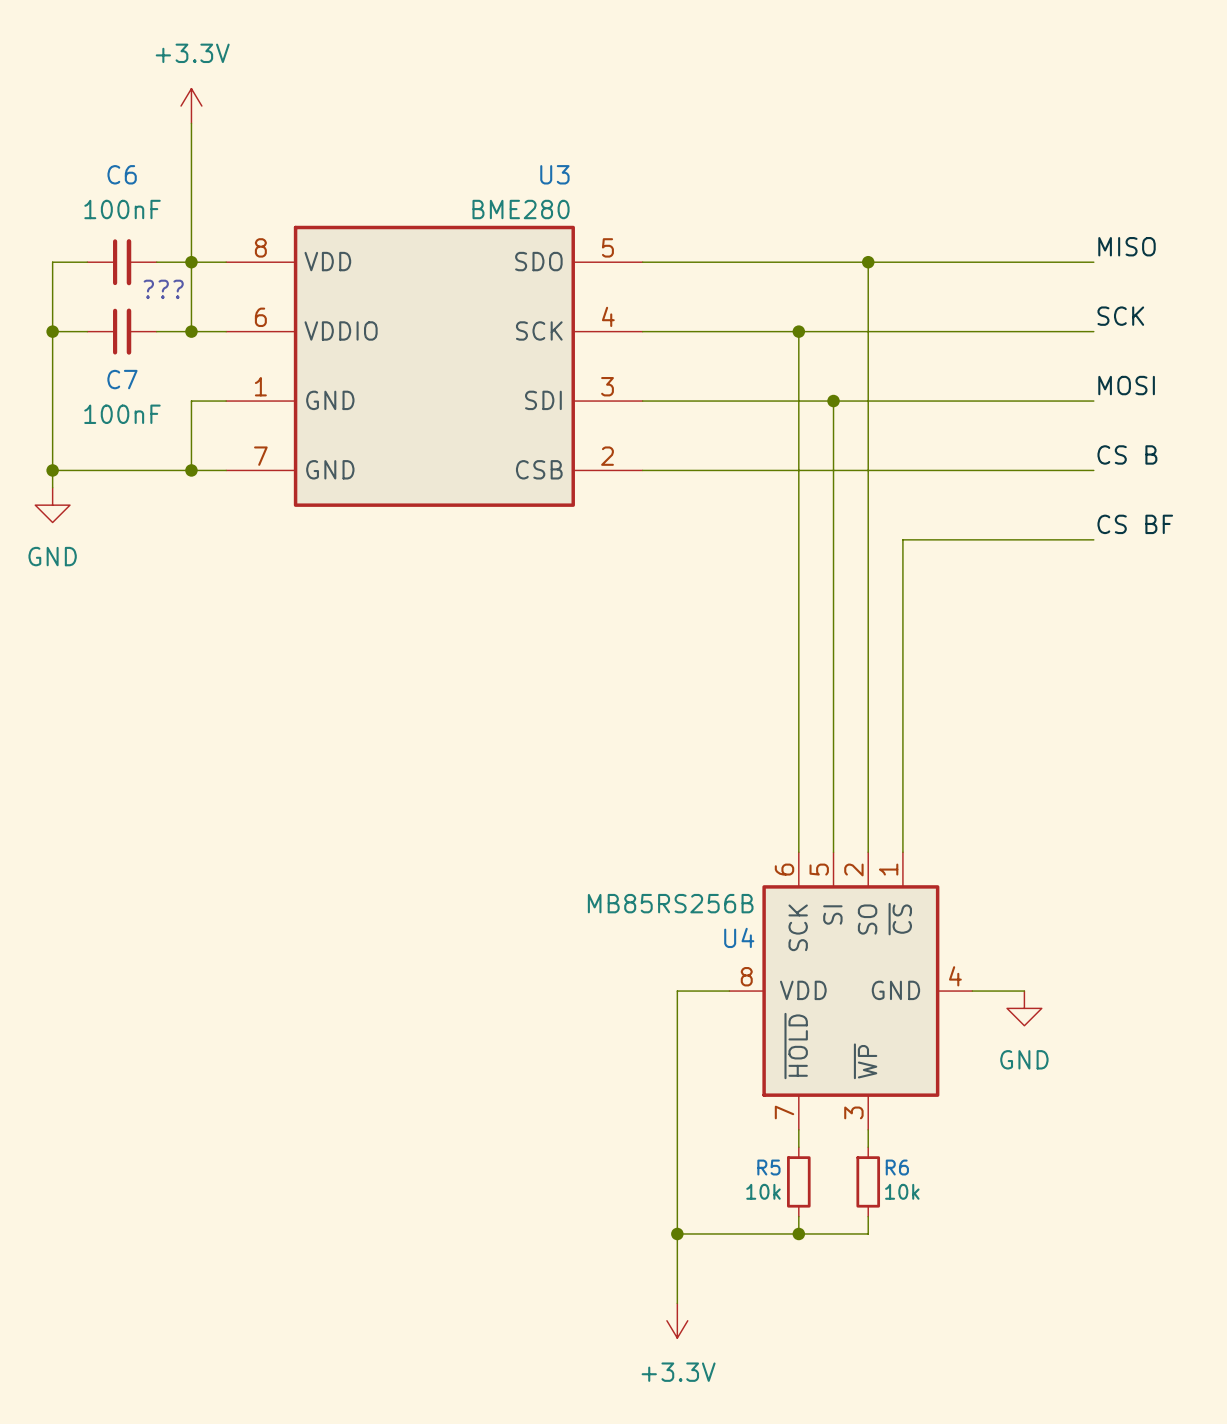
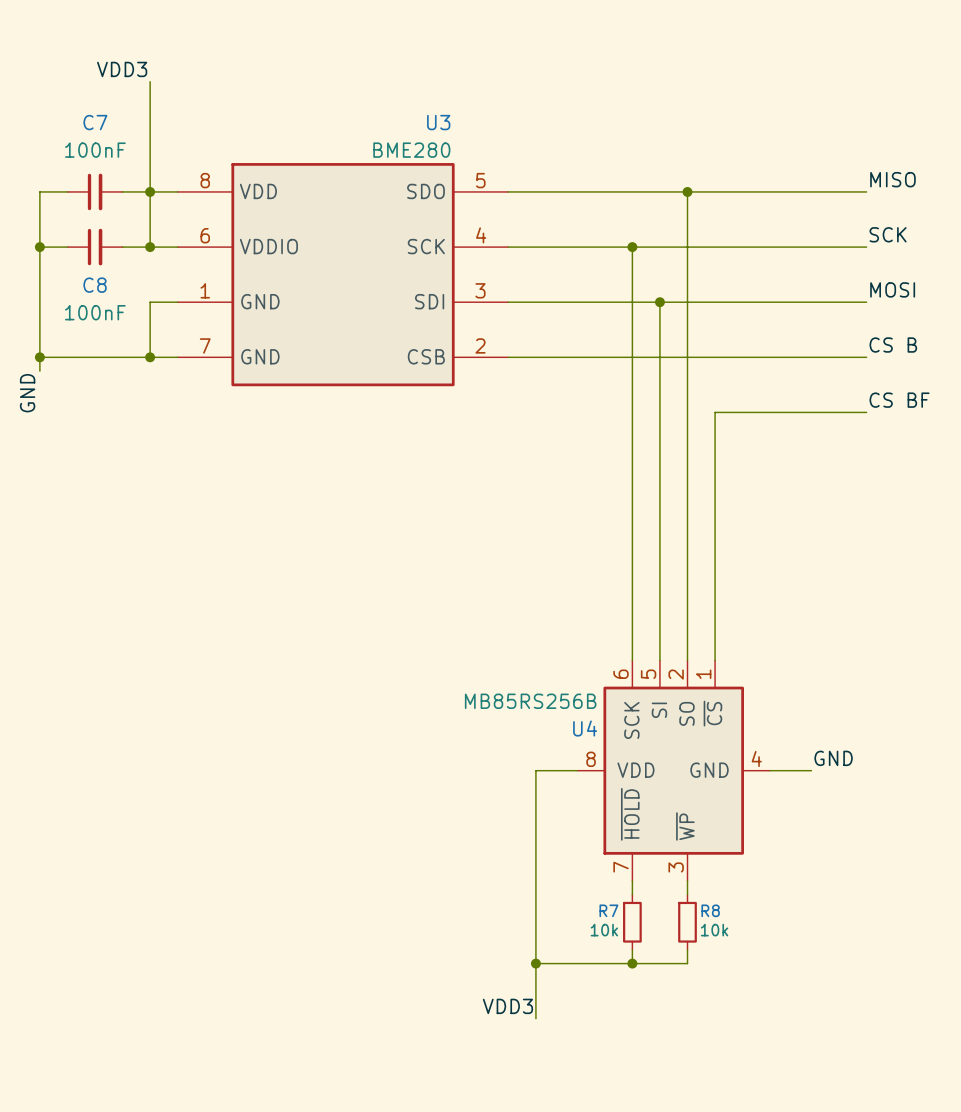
power symbol: +3.3V (191, 106) -> none
label: none -> VDD3 (122, 69)
C6 name: C6 (122, 174) -> C7 (95, 122)
text: ??? (163, 289) -> none
C7 name: C7 (122, 379) -> C8 (95, 285)
power symbol: GND (52, 505) -> none
label: none -> GND (27, 393)
label: none -> GND (833, 758)
power symbol: GND (1024, 1008) -> none
R5 name: R5 (768, 1167) -> R7 (608, 910)
R6 name: R6 (897, 1167) -> R8 (710, 910)
label: none -> VDD3 (507, 1006)
power symbol: +3.3V (677, 1320) -> none

